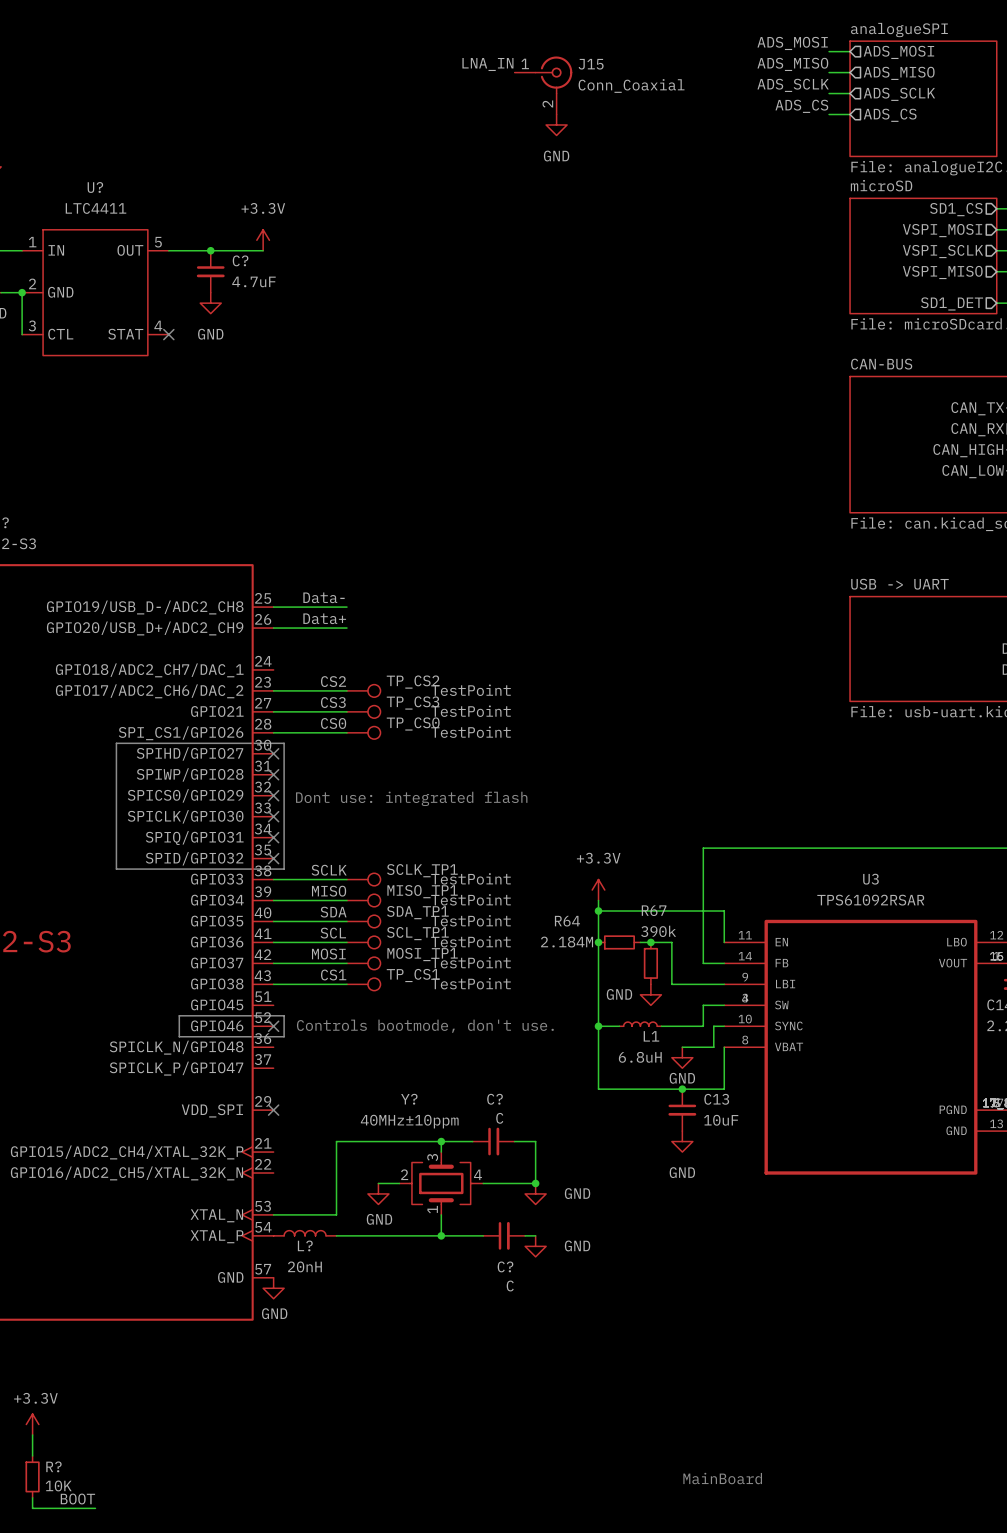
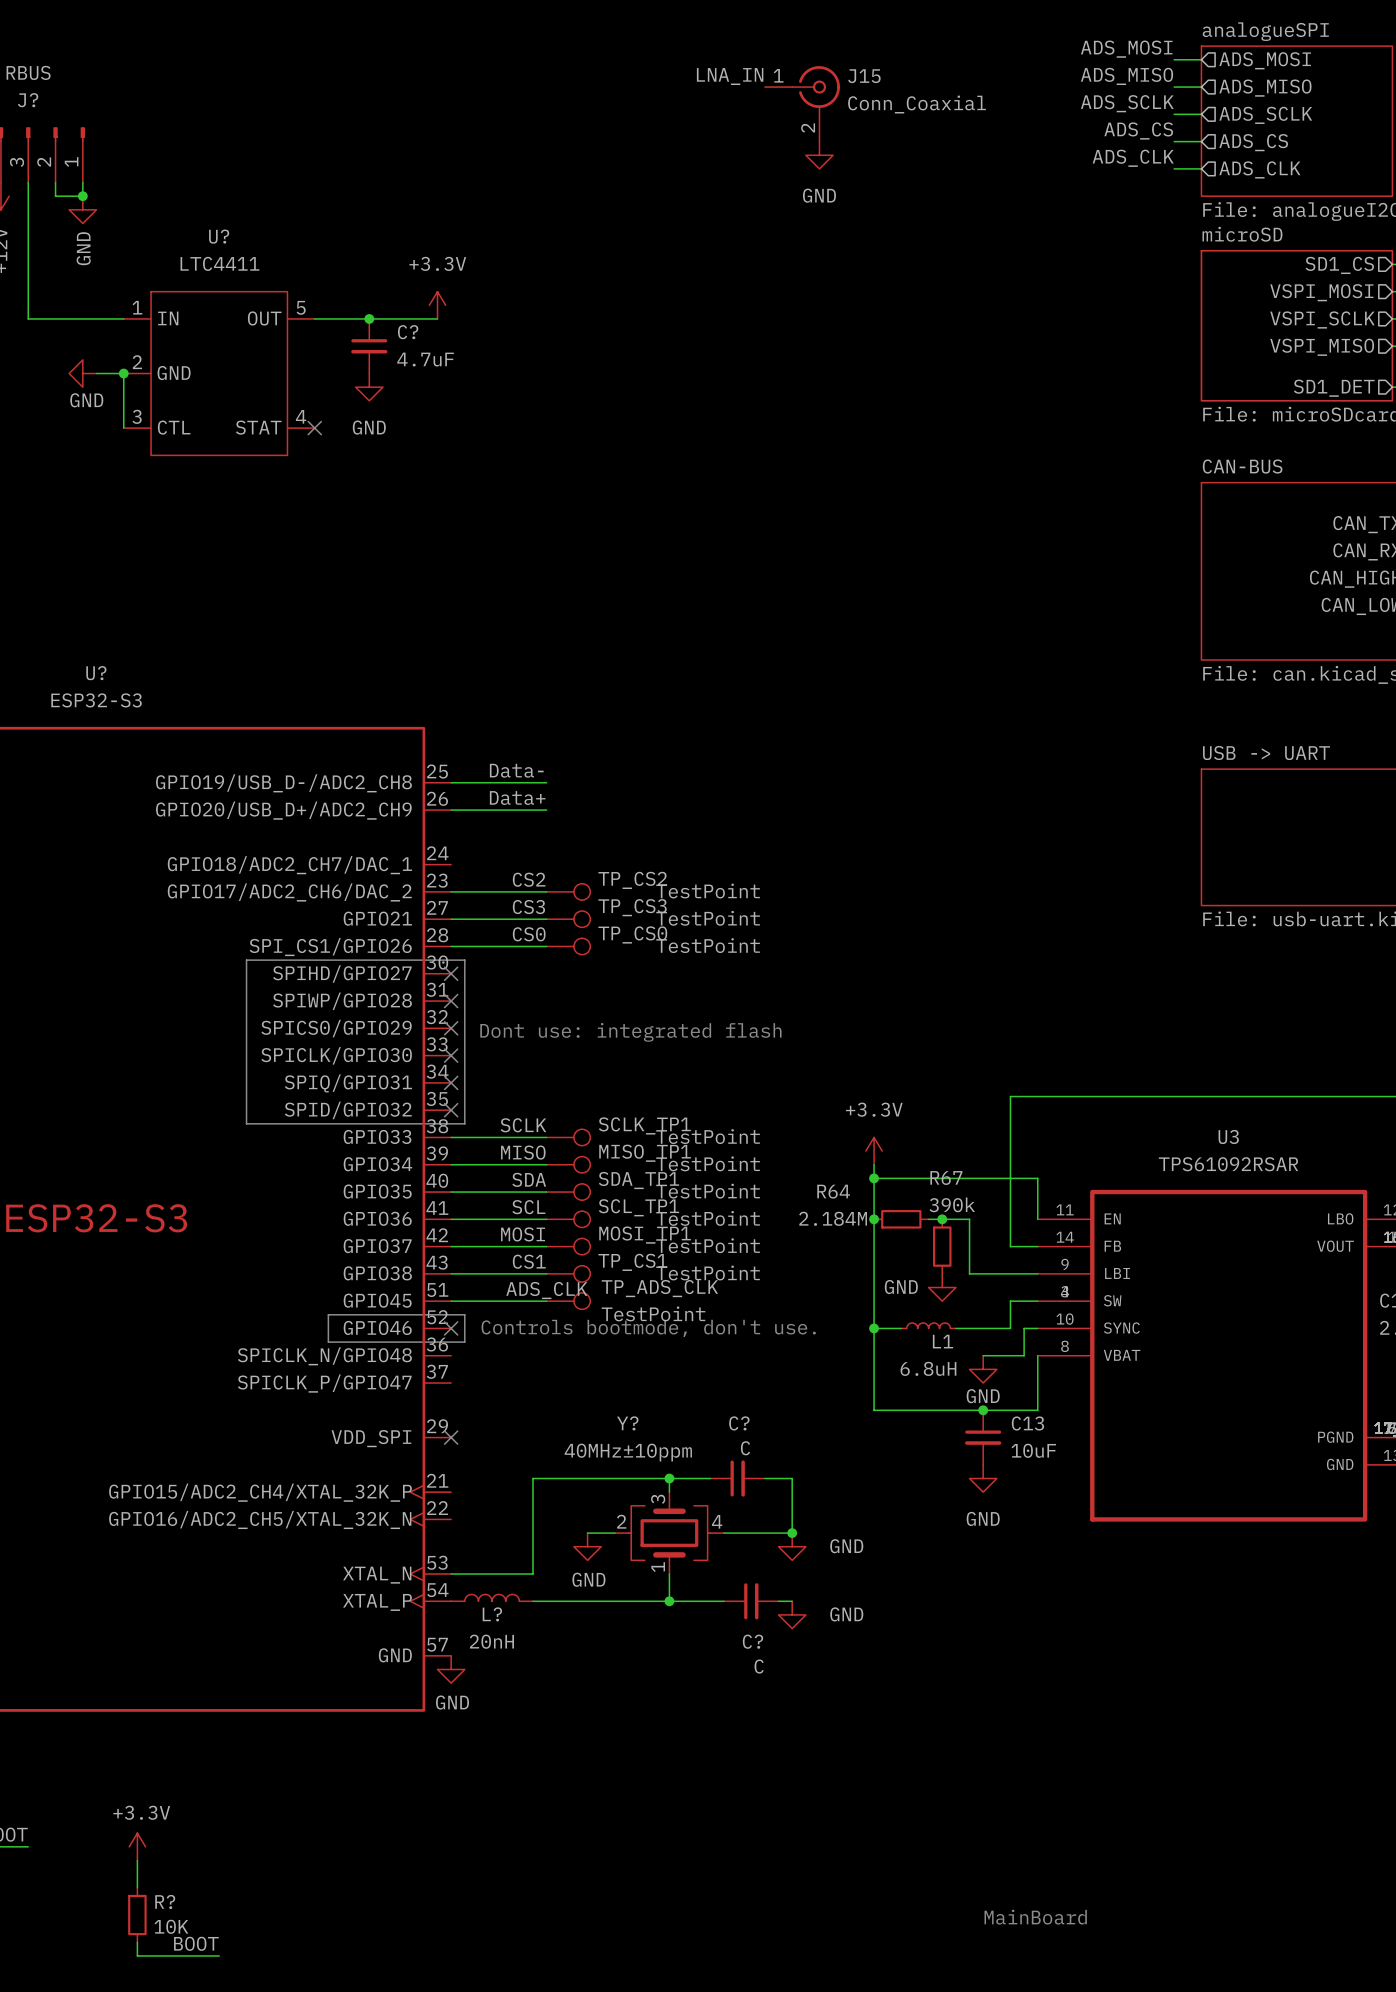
label: none -> ADS_CLK (1133, 158)
wire: none -> (1174, 168) (1201, 168)
hierarchical label: none -> ADS_CLK (1259, 169)
label: none -> ADS_CLK (546, 1290)
wire: none -> (451, 1301) (546, 1301)
TP_ADS_CLK: none -> TestPoint (568, 1301)

